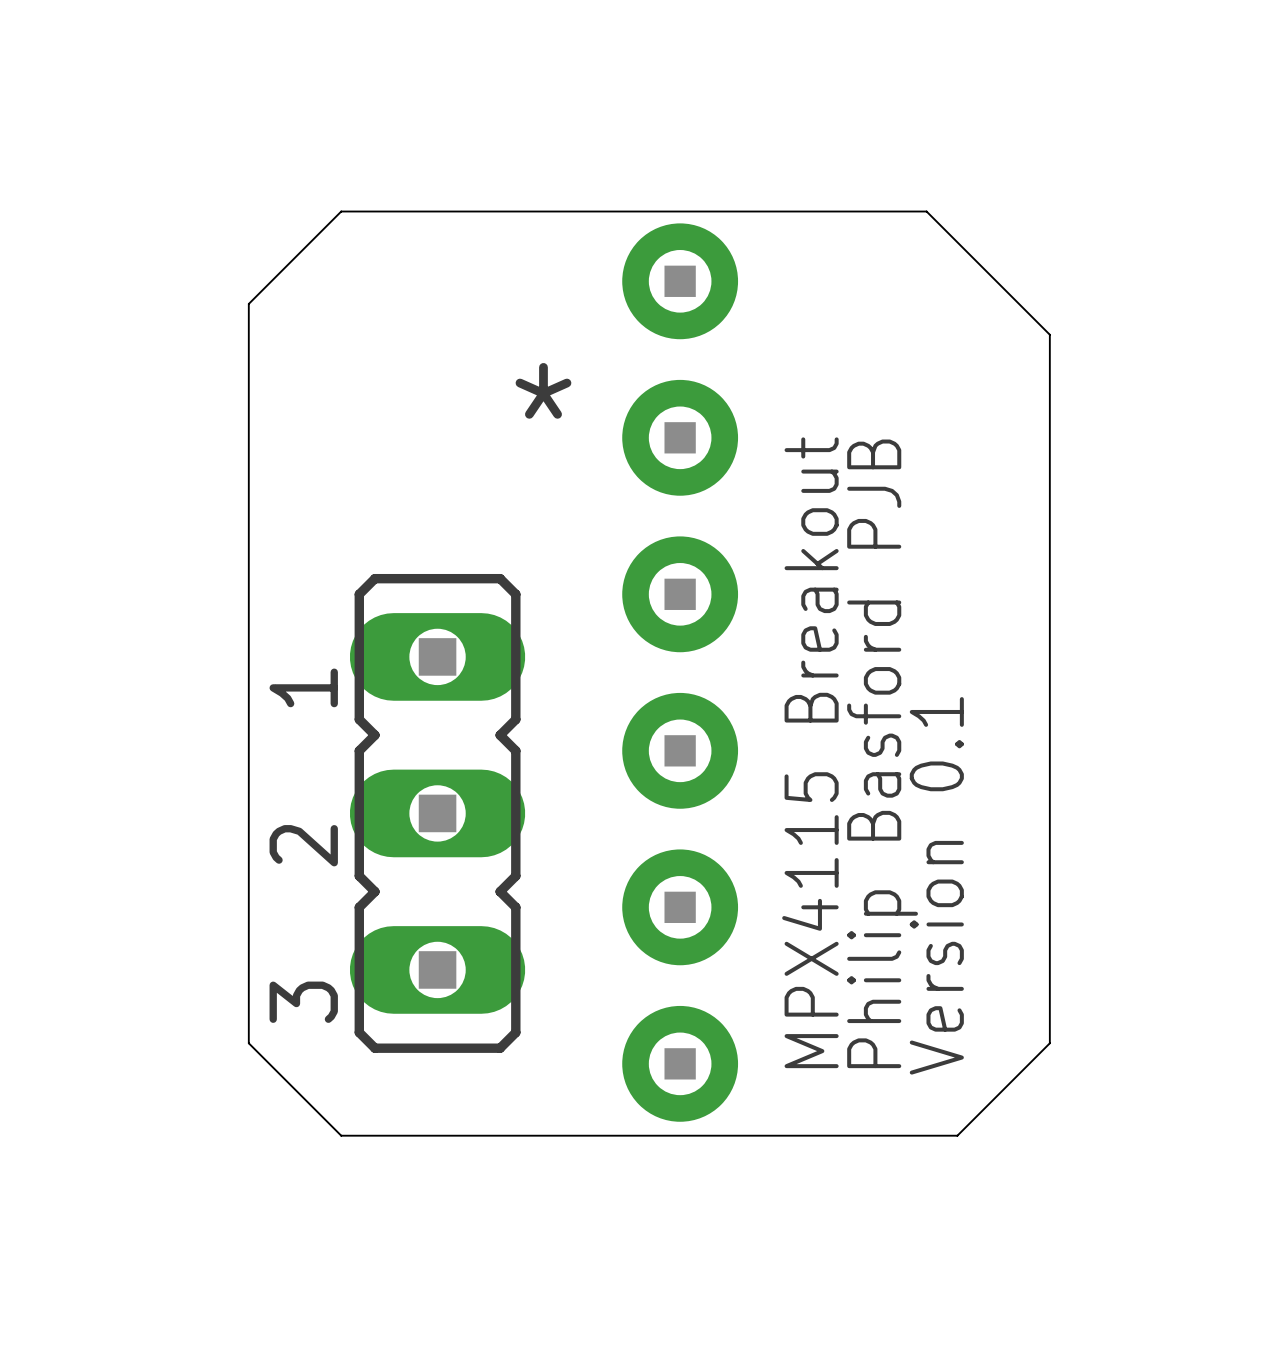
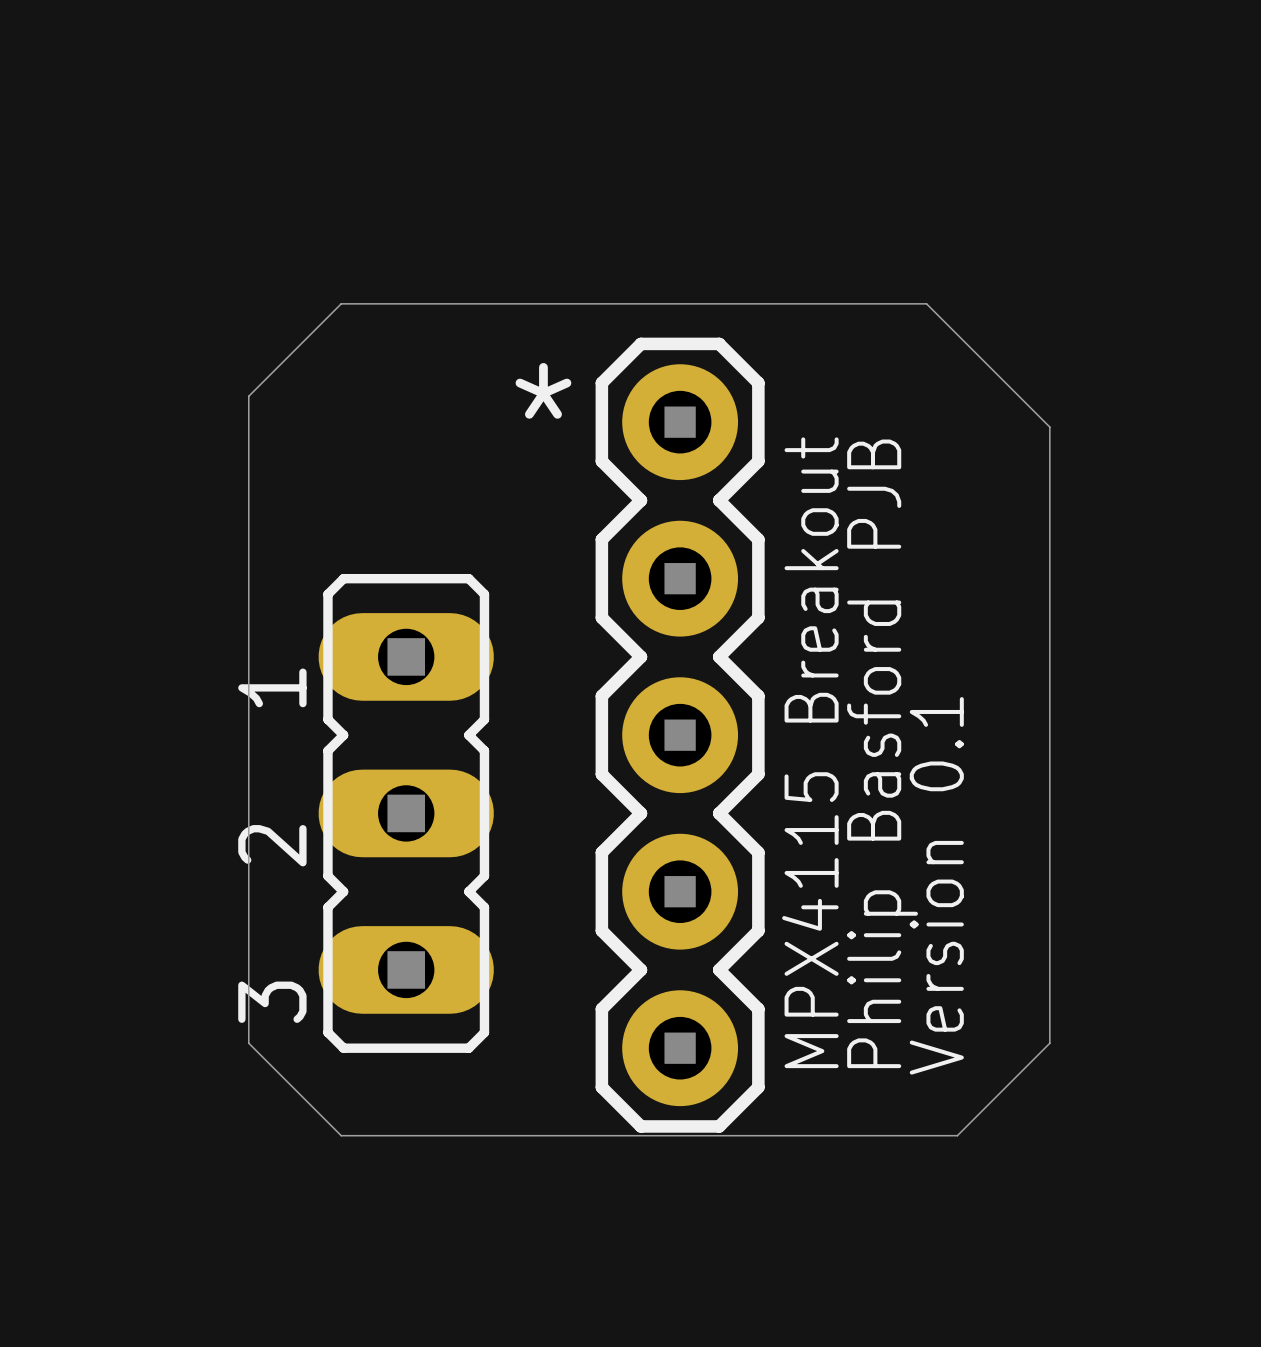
board edge: (248, 396) (248, 303) (341, 211) (926, 211) (1049, 334) (1049, 427) -> (248, 396) (341, 303) (926, 303) (1049, 427)
part: (680, 672) -> none
part: none -> (680, 735)
part position: (437, 813) -> (406, 813)

